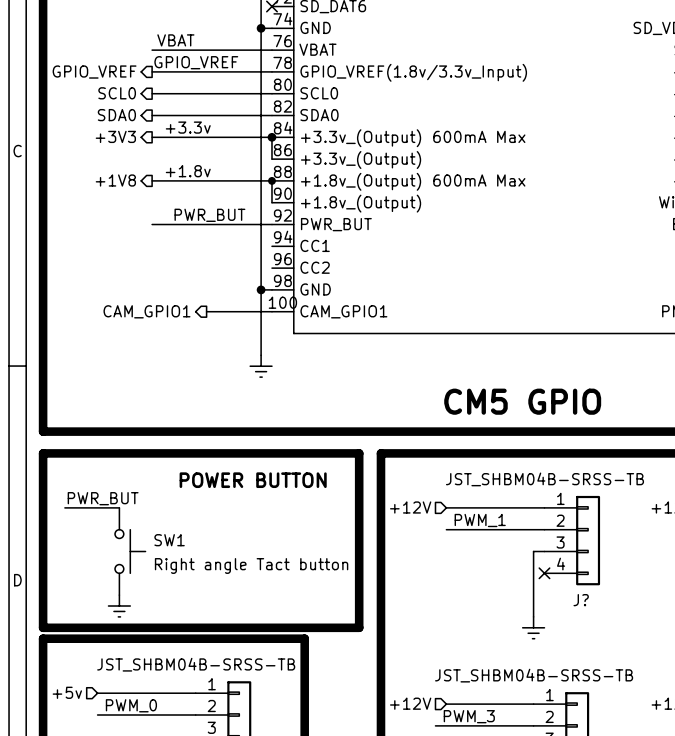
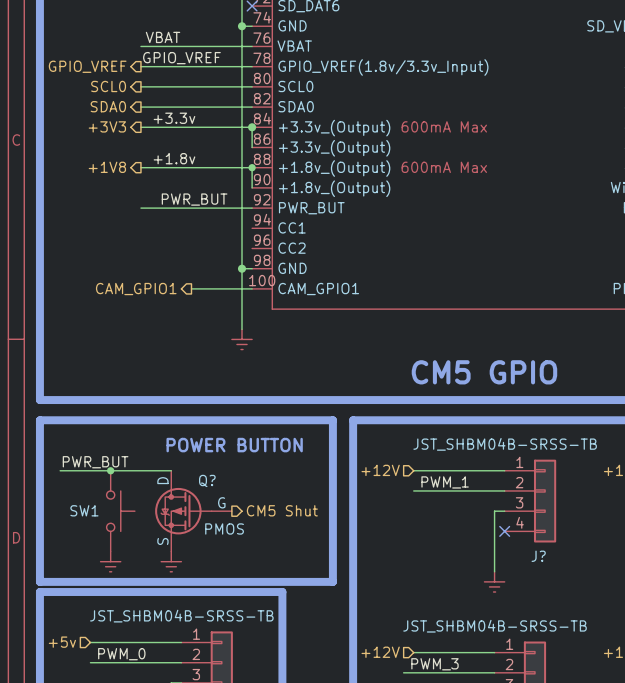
wire: none -> (110, 470) (171, 470)
junction: none -> (110, 470)
SW1 name position: SW1 (169, 540) -> SW1 (84, 510)
Q?: none -> PMOS (193, 511)
hierarchical label: none -> CM5 Shut (282, 510)
SW1 value: Right angle Tact button (251, 565) -> none
power symbol: none -> (171, 561)

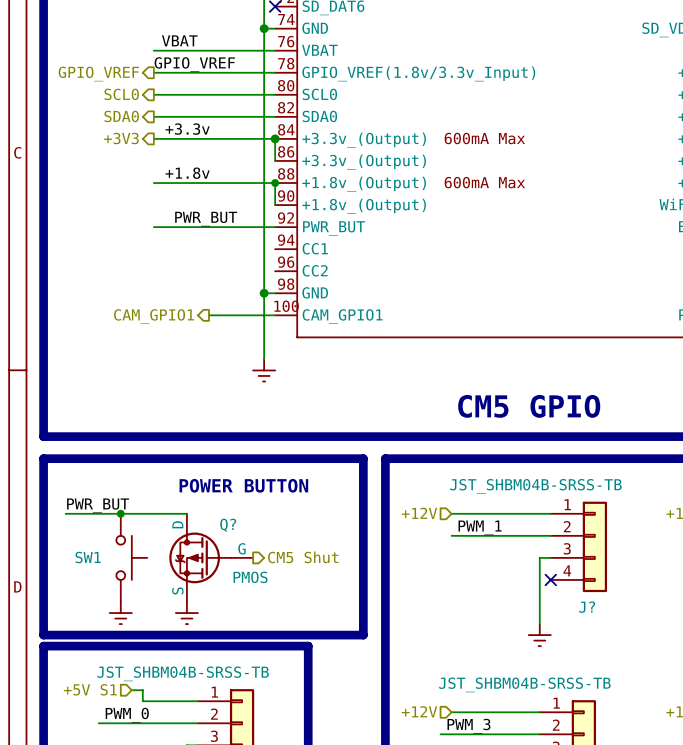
hierarchical label: +1V8 (107, 167) -> none
hierarchical label: none -> +5V S1 (90, 689)
hierarchical label: +5v (62, 642) -> none
wire: (90, 642) (130, 642) -> (131, 690) (142, 690) (142, 701)

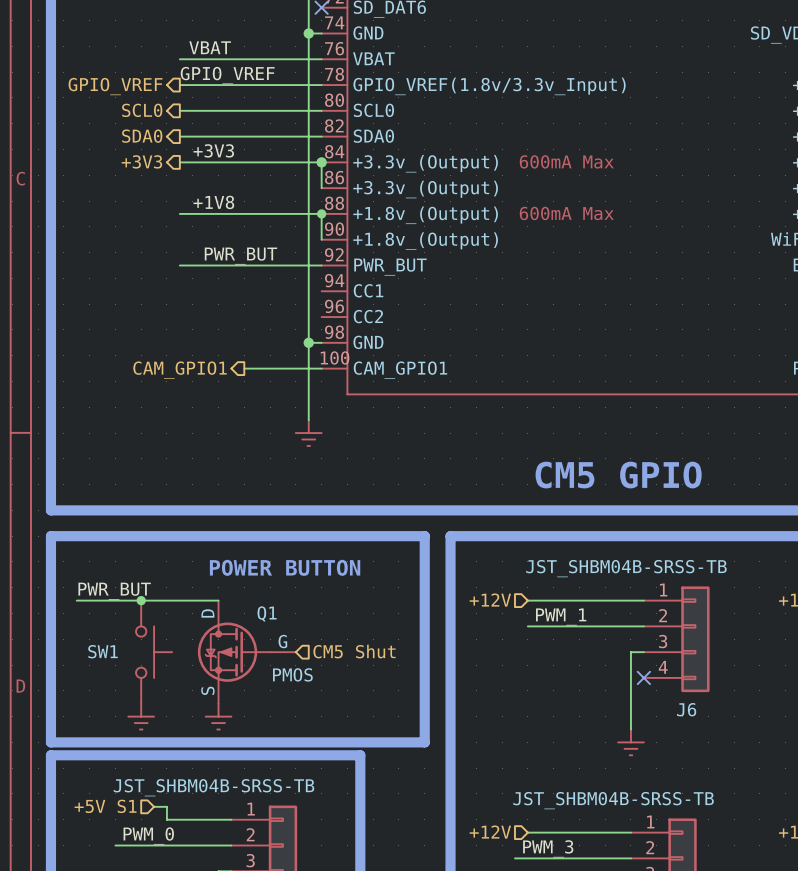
label: +3.3v (187, 129) -> +3V3 (213, 150)
label: +1.8v (187, 173) -> +1V8 (213, 202)
Q? name: Q? (228, 525) -> Q1 (267, 614)
hierarchical label shape: output (303, 557) -> input (354, 651)
J? name: J? (587, 607) -> J6 (686, 709)

